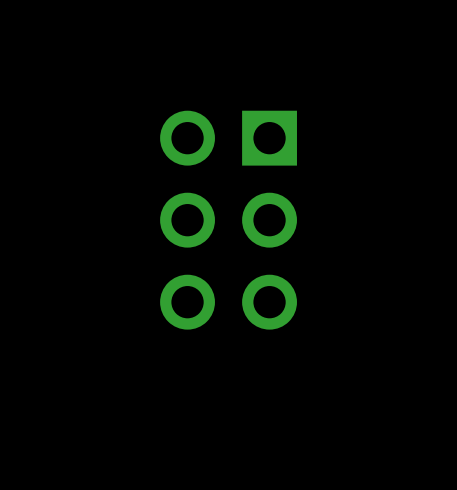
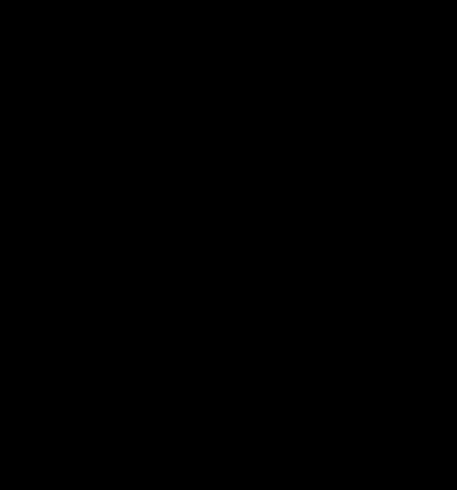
part: (228, 220) -> none

